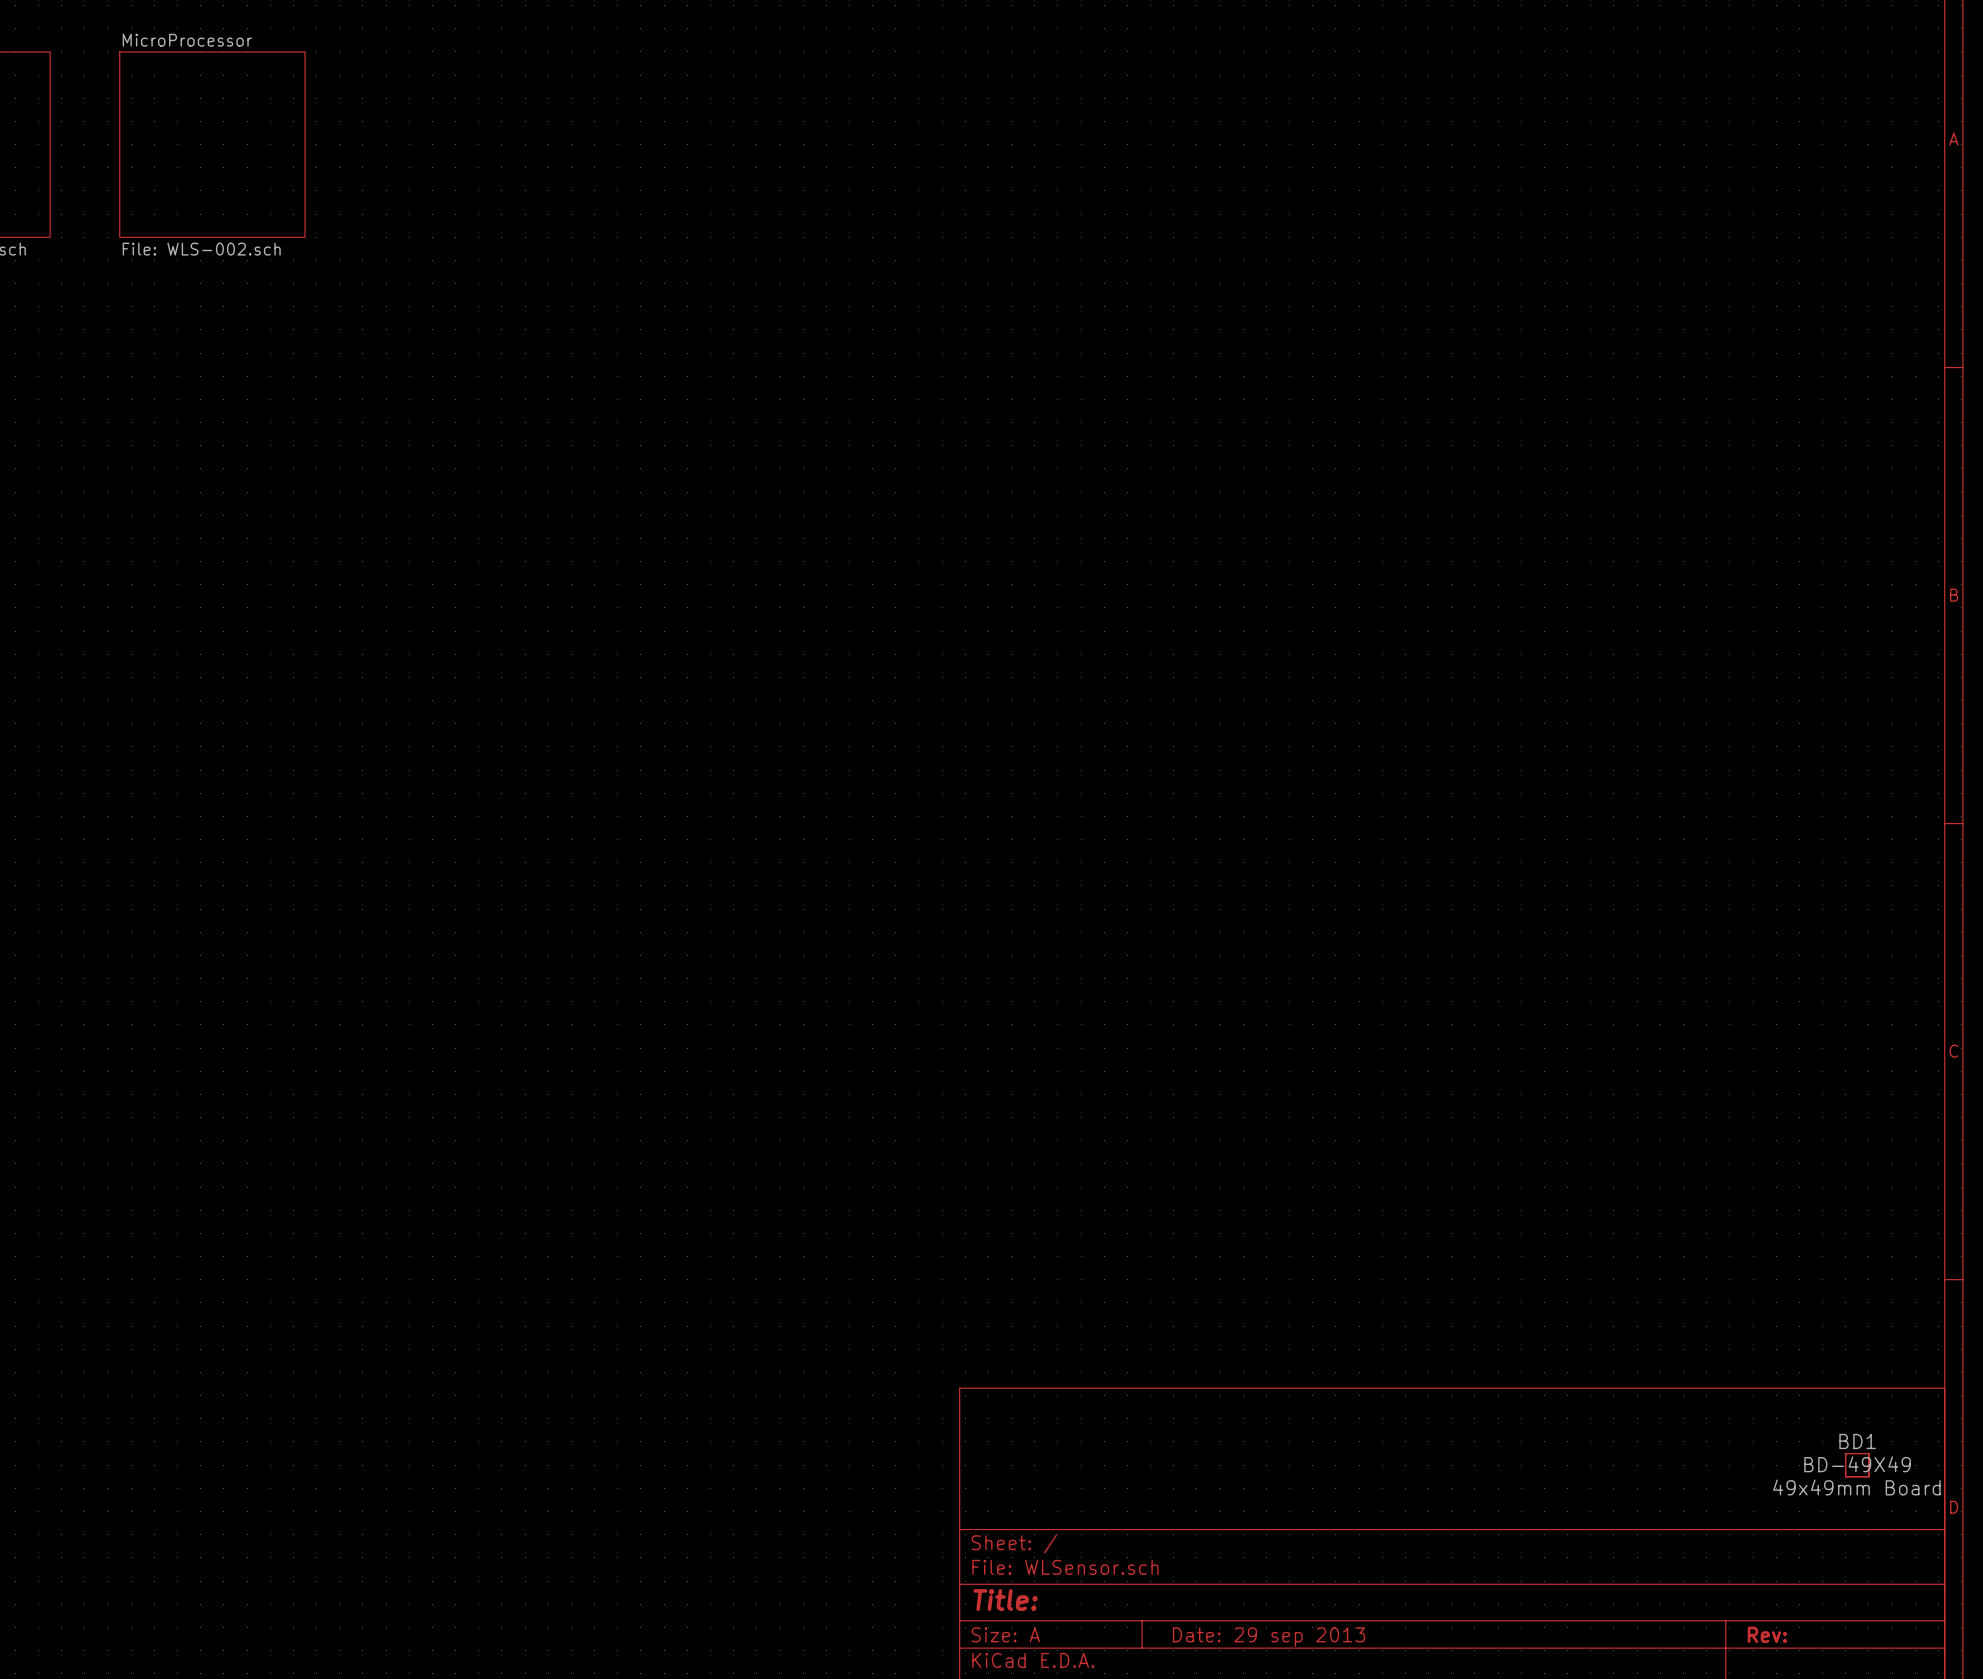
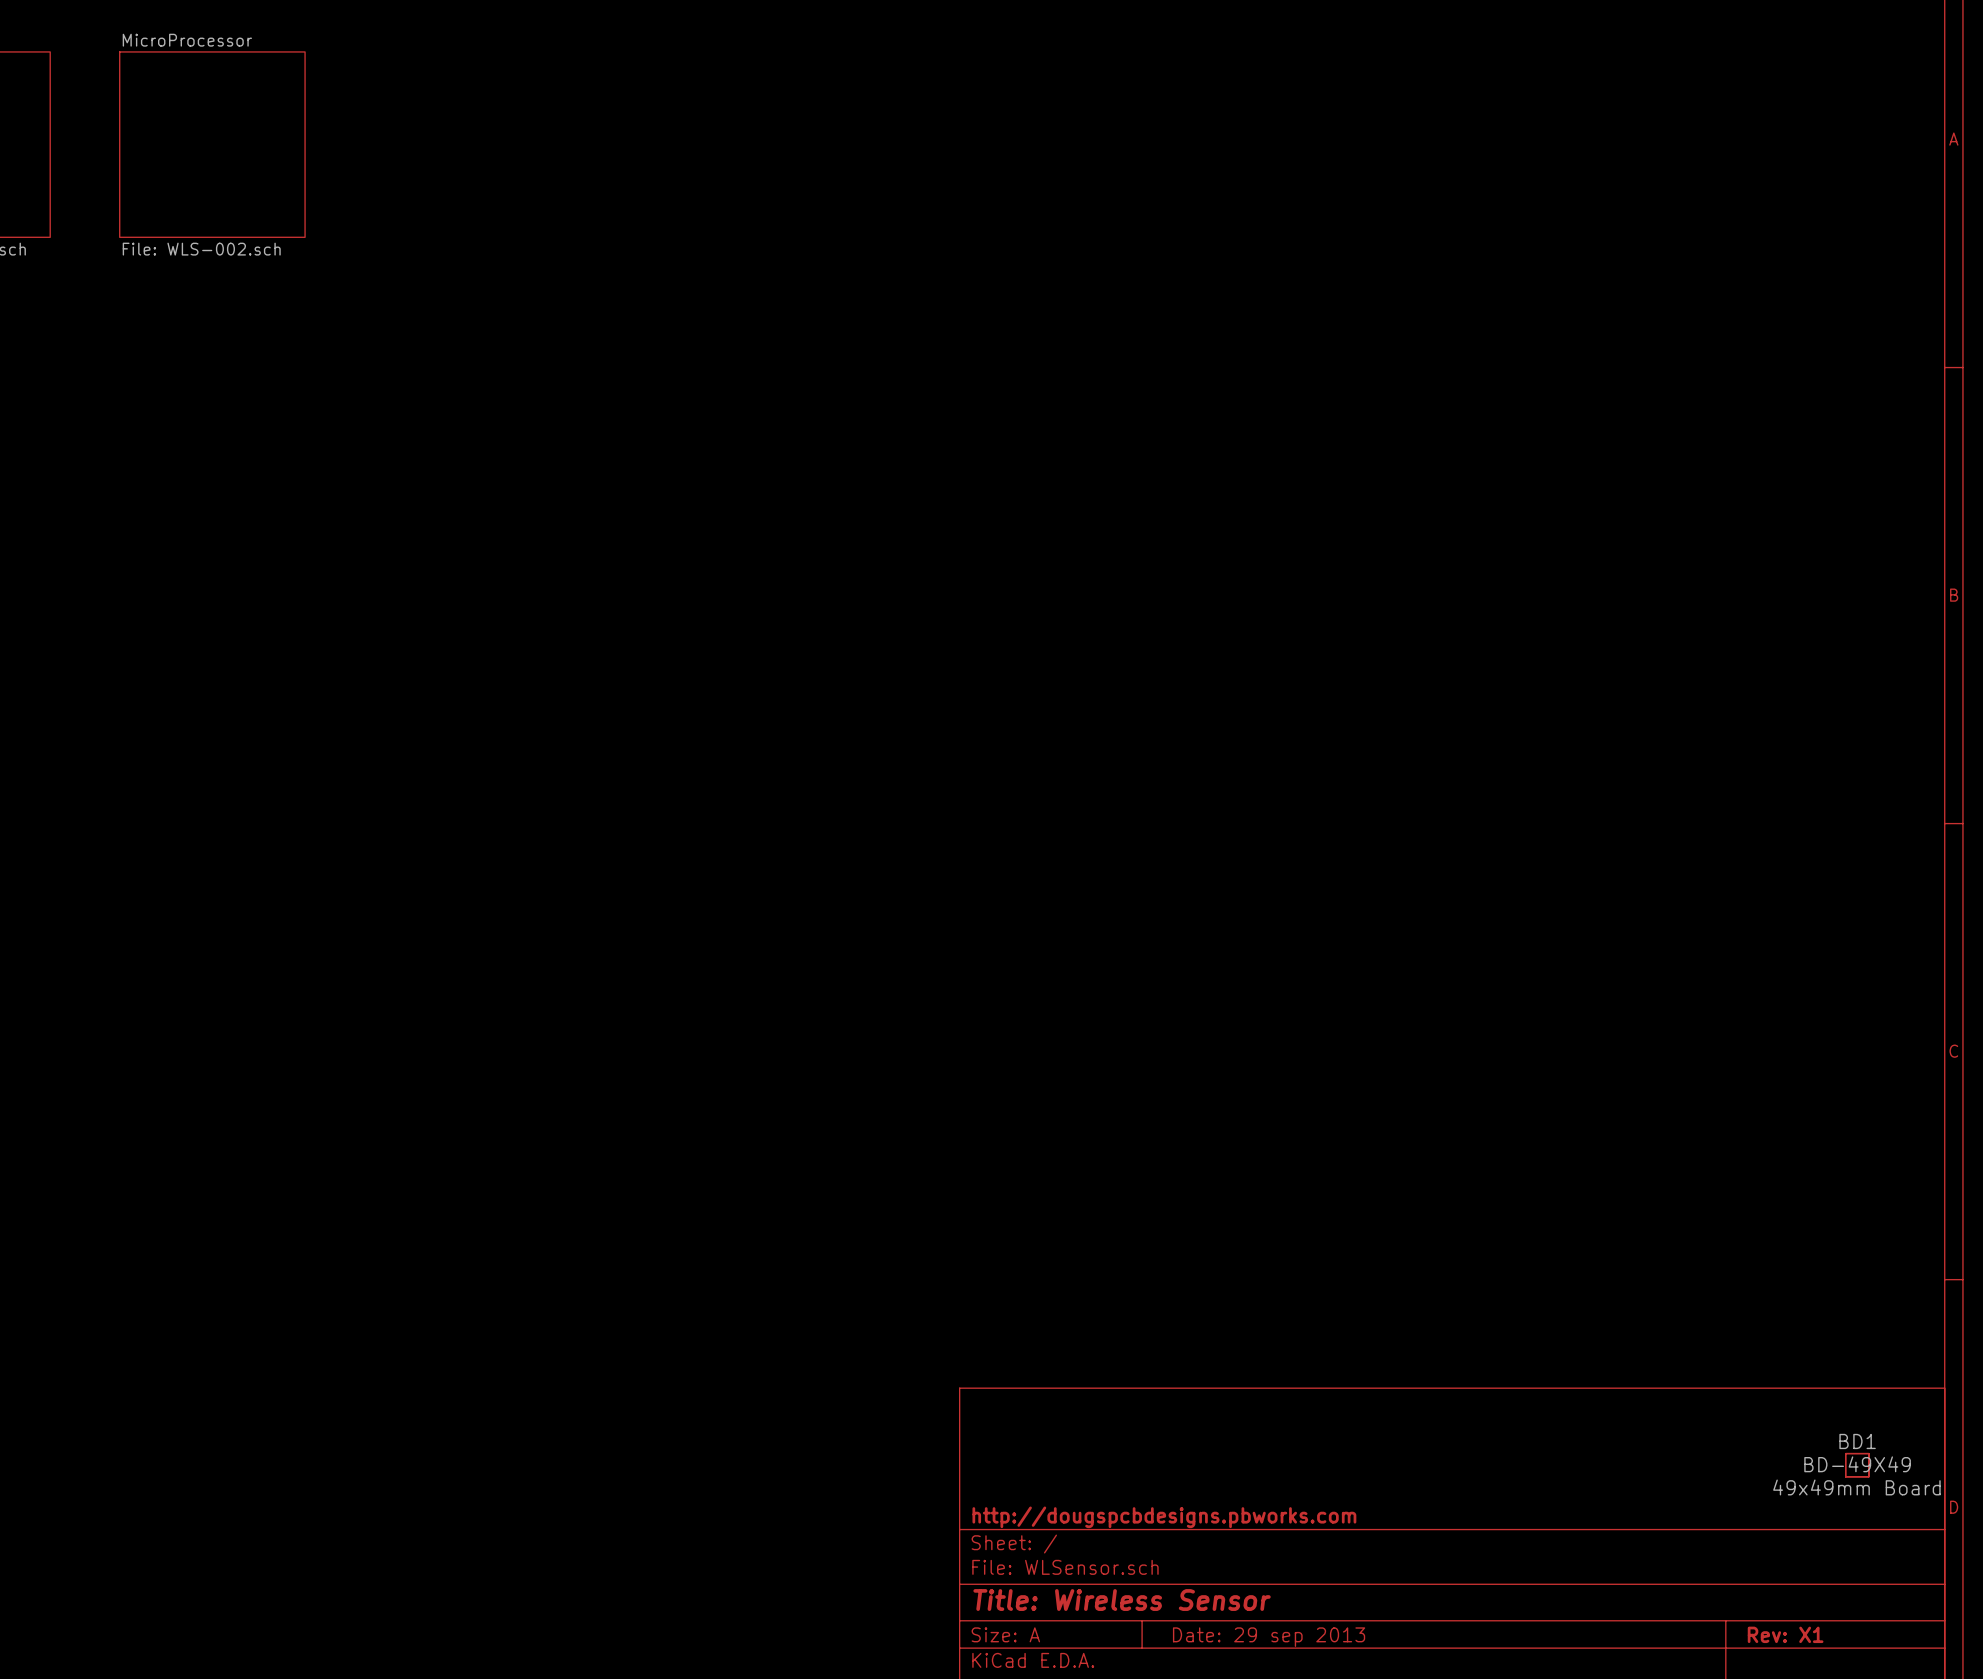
title block: none -> http://dougspcbdesigns.pbworks.com (1164, 1517)
title block: Title: (1005, 1600) -> Title: Wireless Sensor (1122, 1600)
title block: Rev: (1767, 1634) -> Rev: X1 (1785, 1634)

